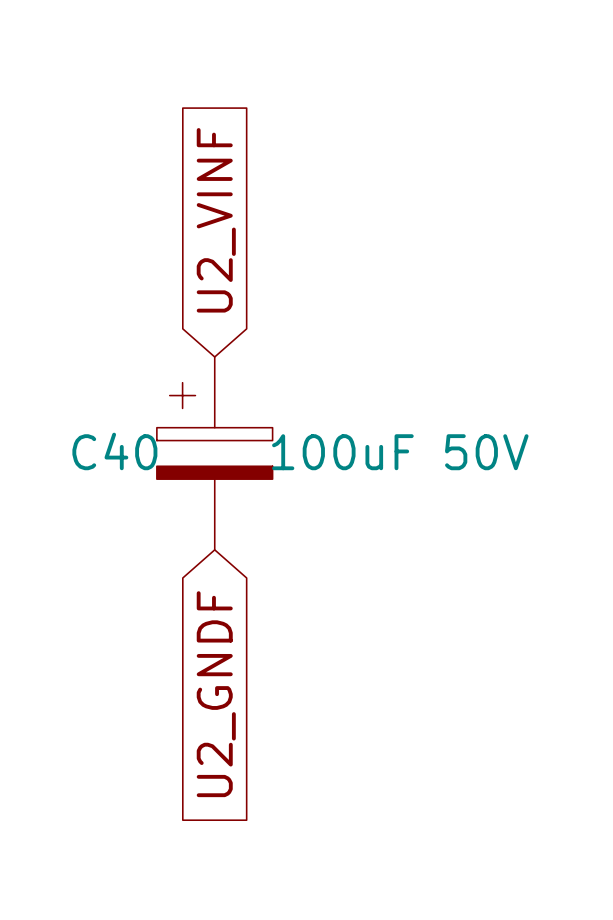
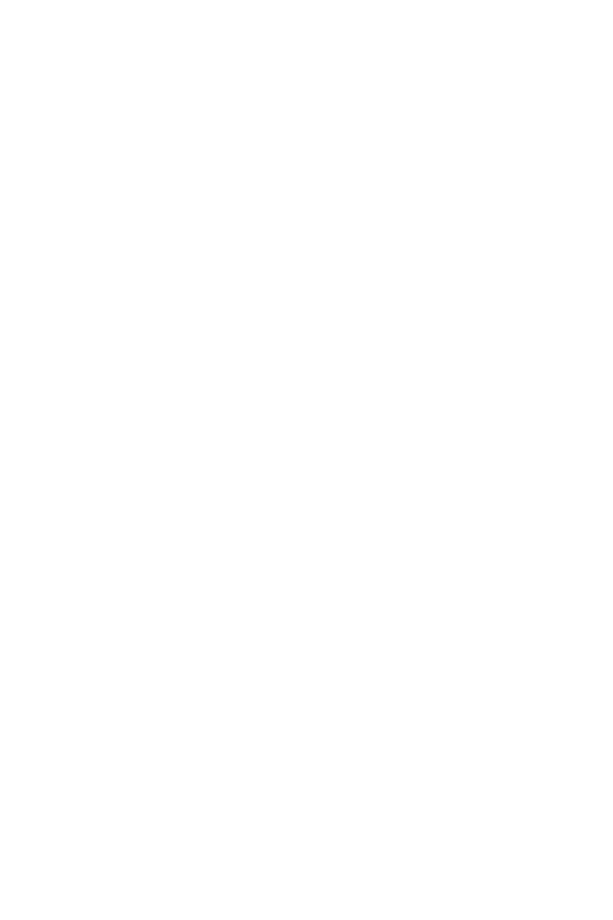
global label: U2_VINF (216, 220) -> none
C40: 100uF 50V (214, 453) -> none
global label: U2_GNDF (216, 694) -> none

